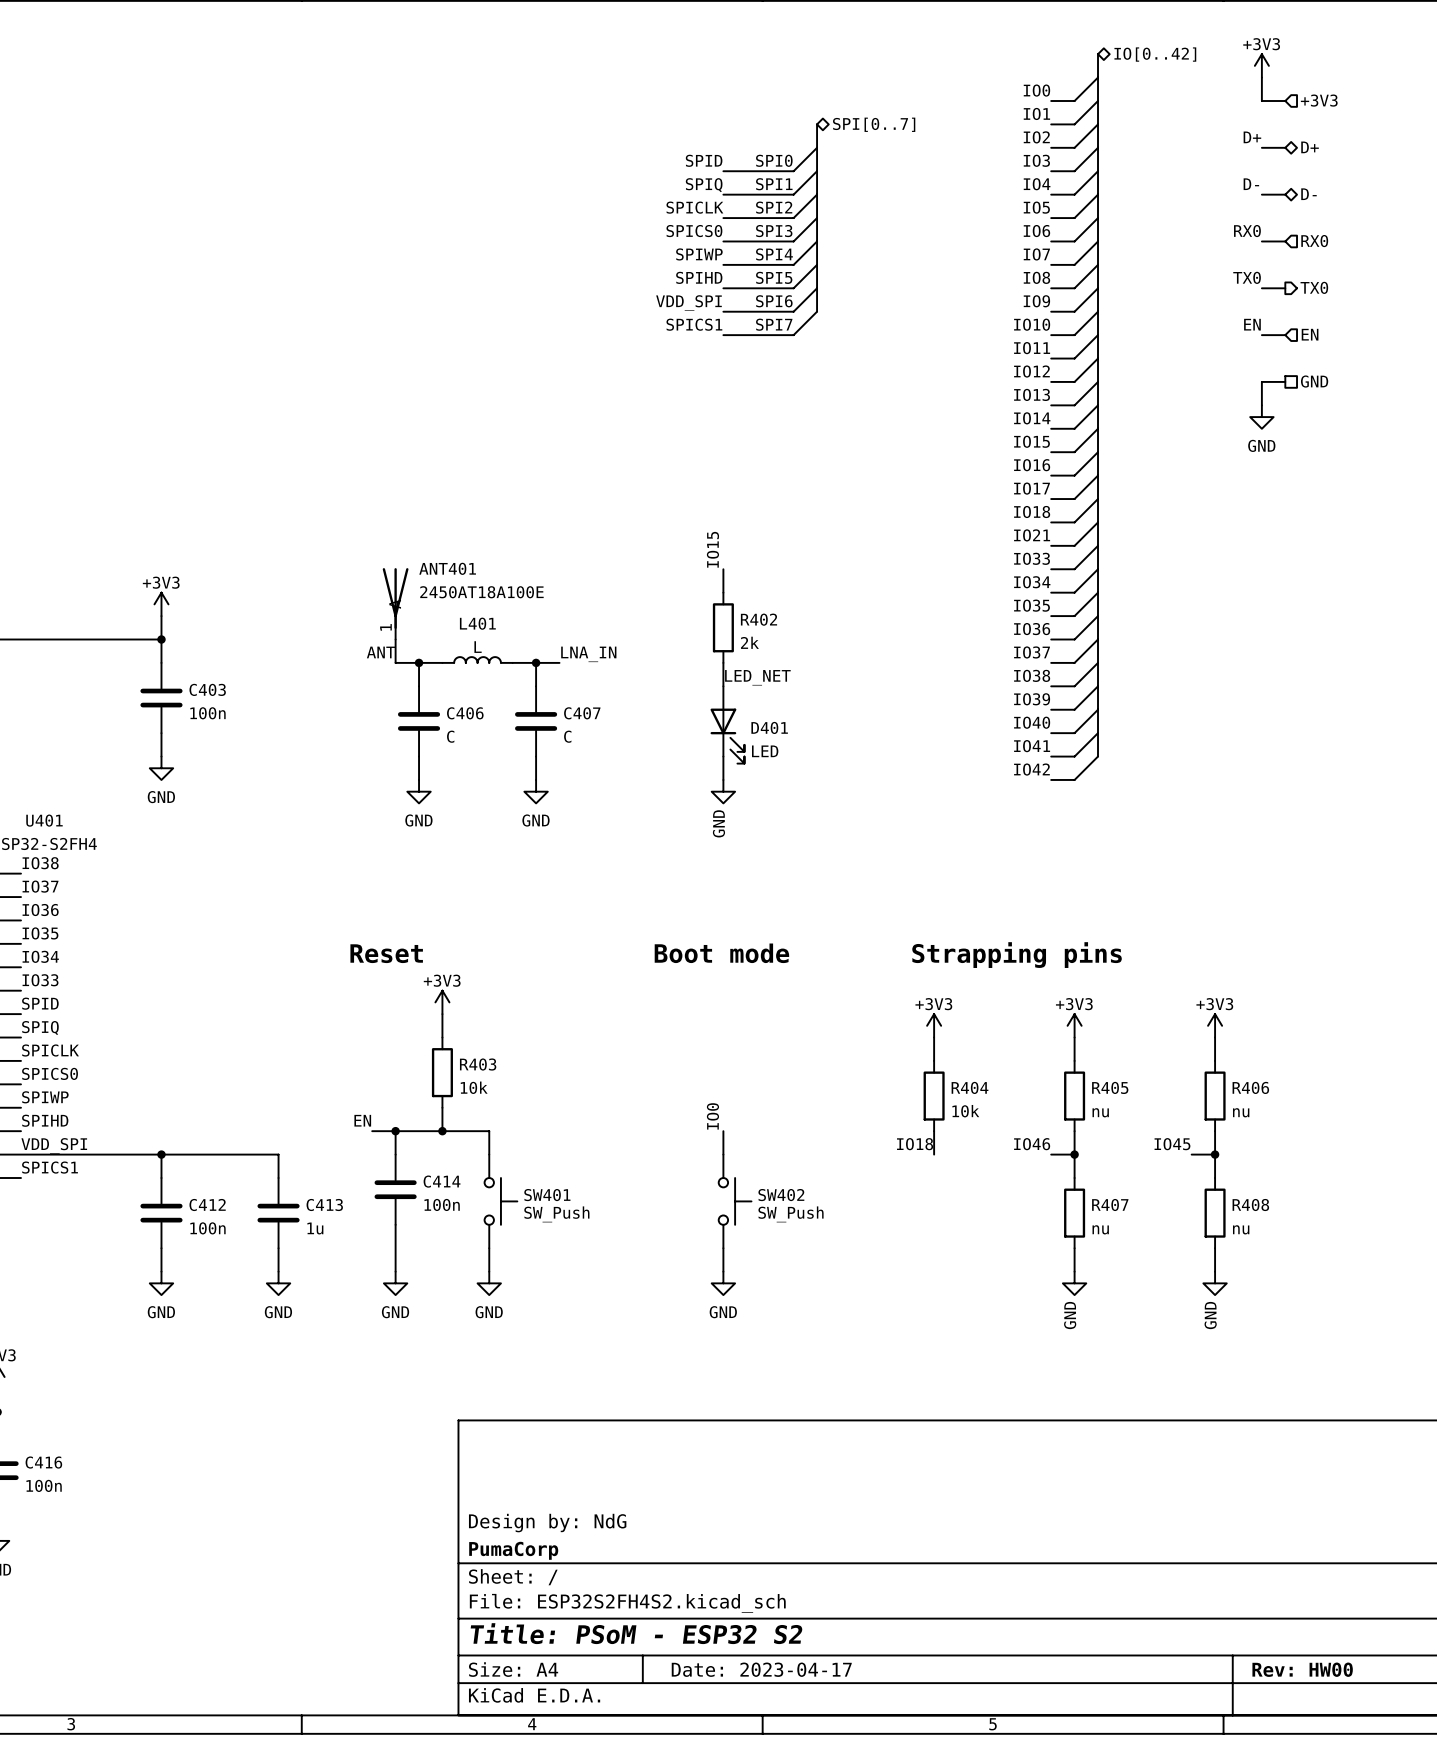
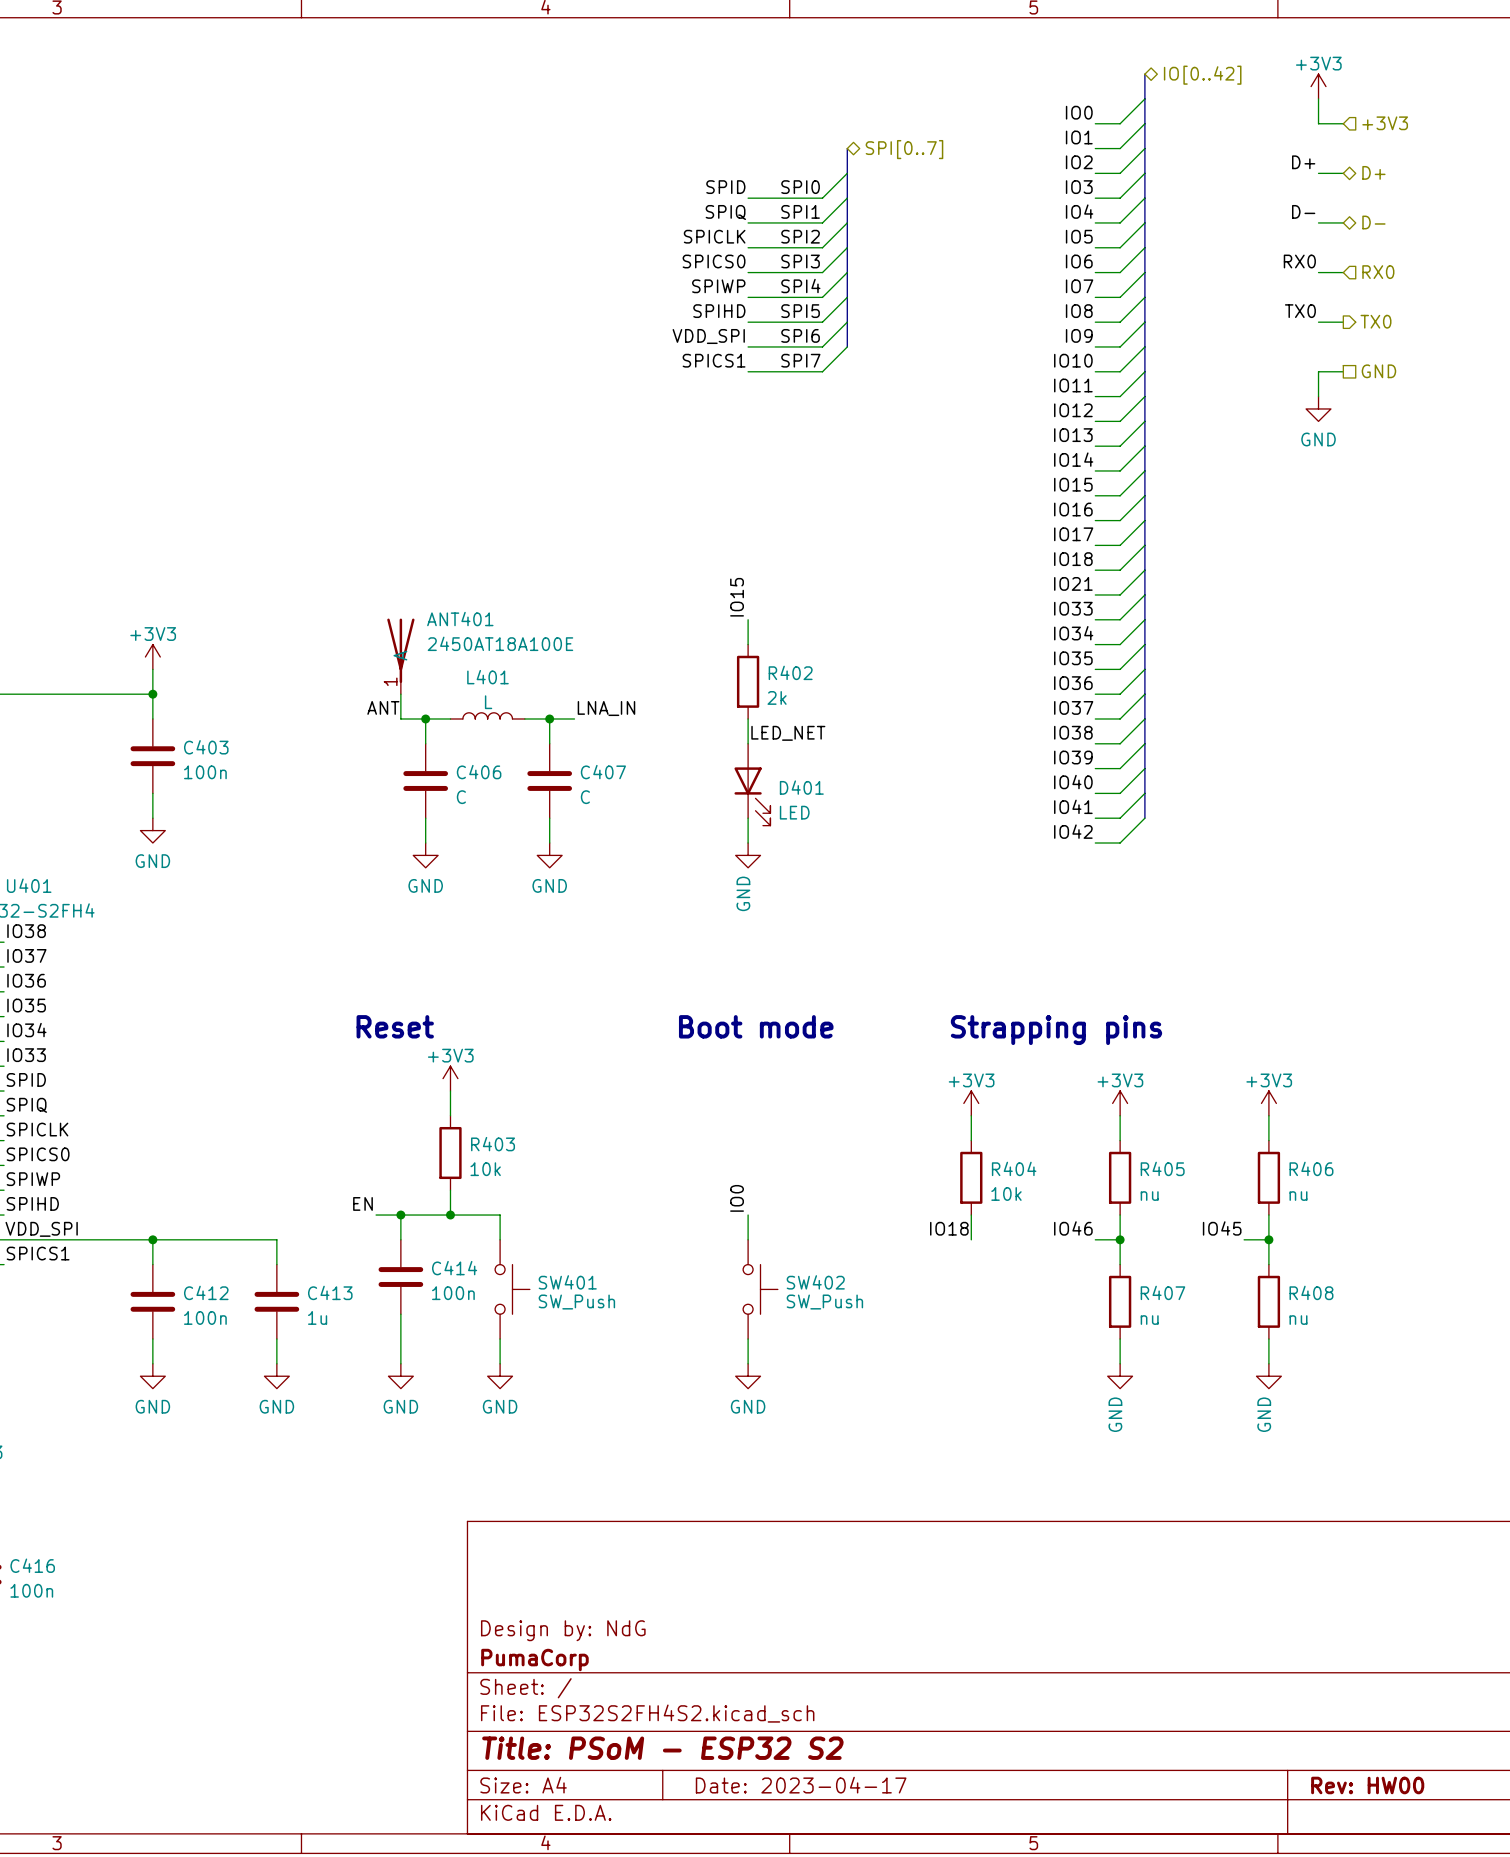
label: EN (1252, 324) -> none
hierarchical label shape: input (1310, 334) -> passive (1378, 371)
hierarchical label: EN (1310, 334) -> GND (1378, 371)
wire: none -> (1318, 371) (1318, 396)
wire: (1285, 381) (1261, 381) (1261, 405) -> none
hierarchical label: GND (1314, 381) -> none
power symbol position: GND (1261, 417) -> GND (1318, 408)

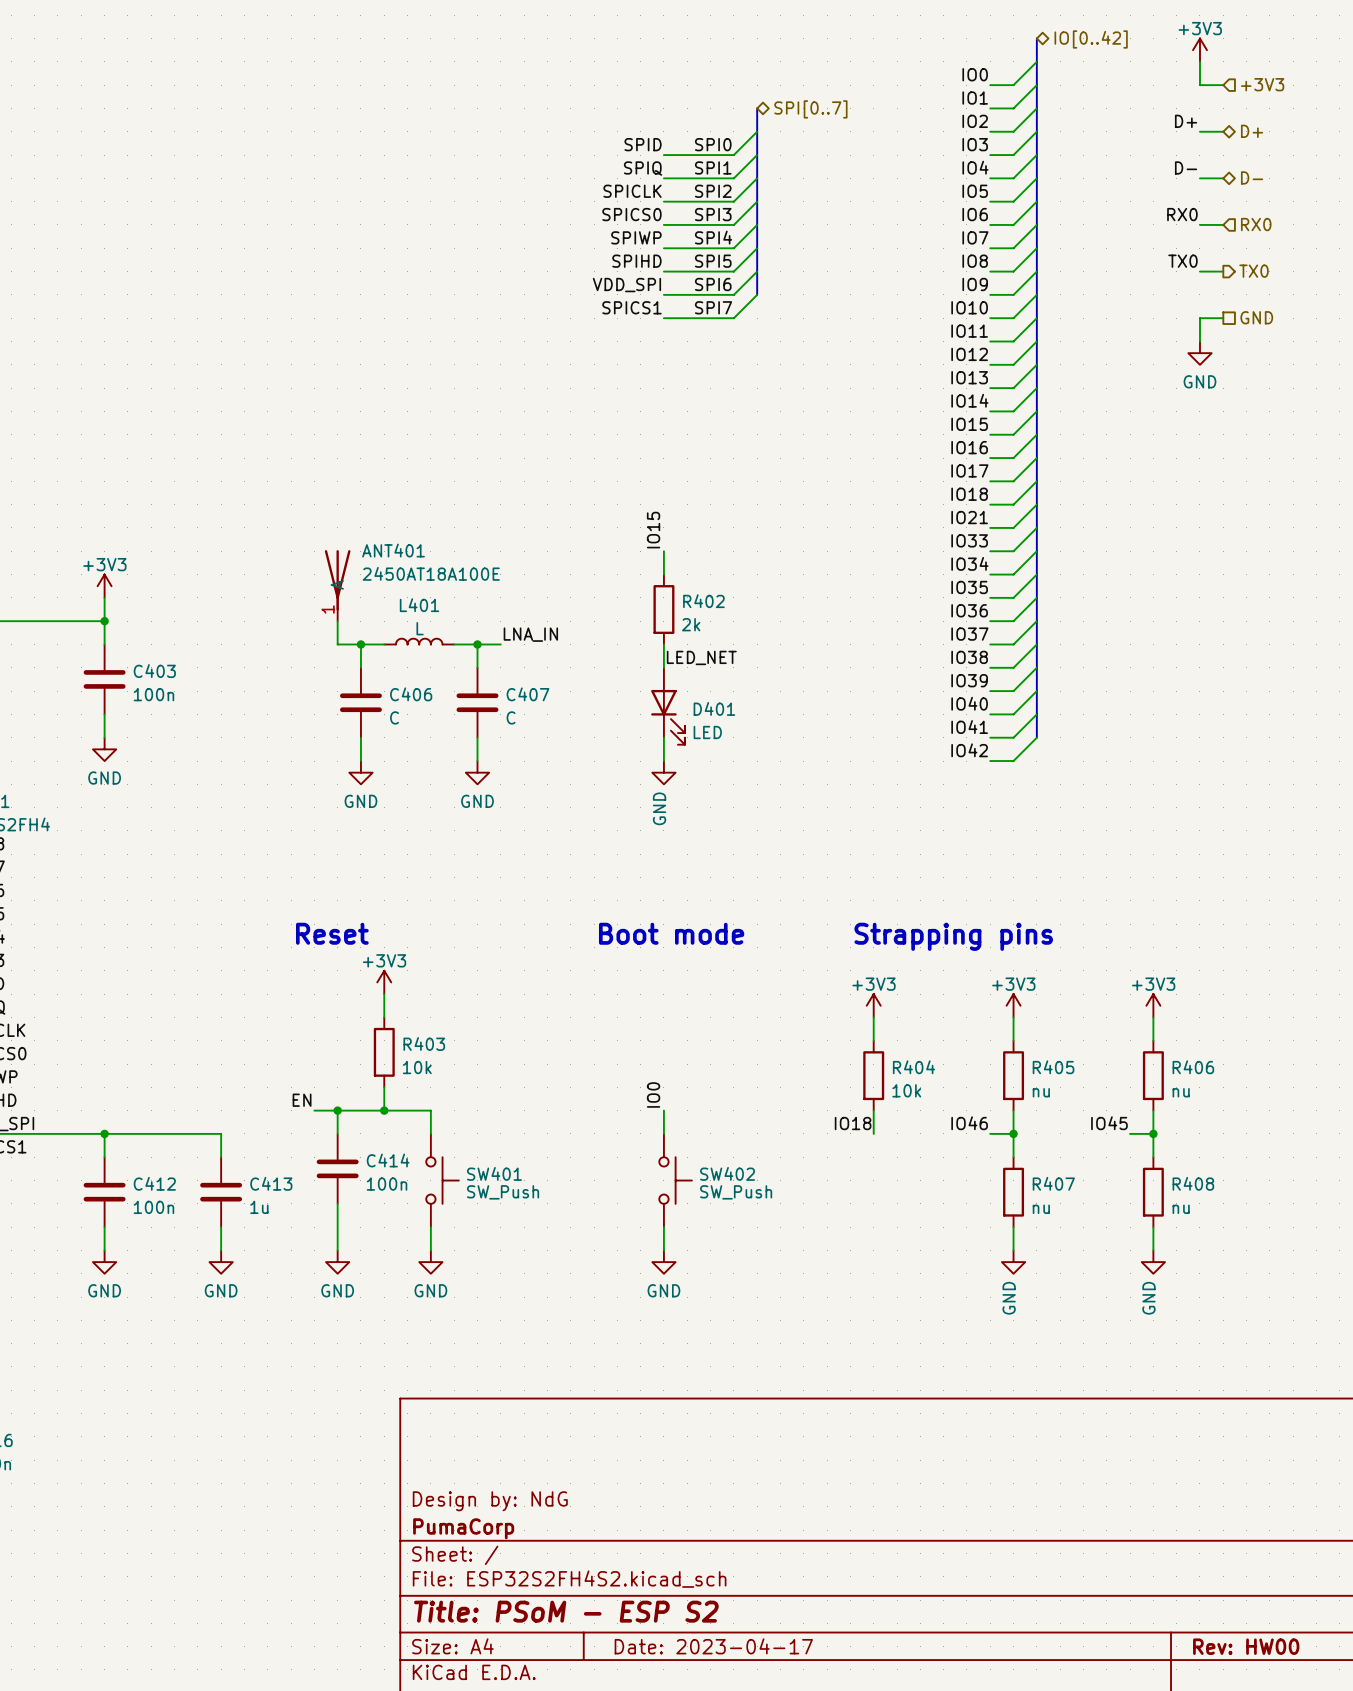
label: ANT (383, 707) -> none
title block: Title: PSoM - ESP32 S2 (662, 1748) -> Title: PSoM - ESP S2 (566, 1611)

